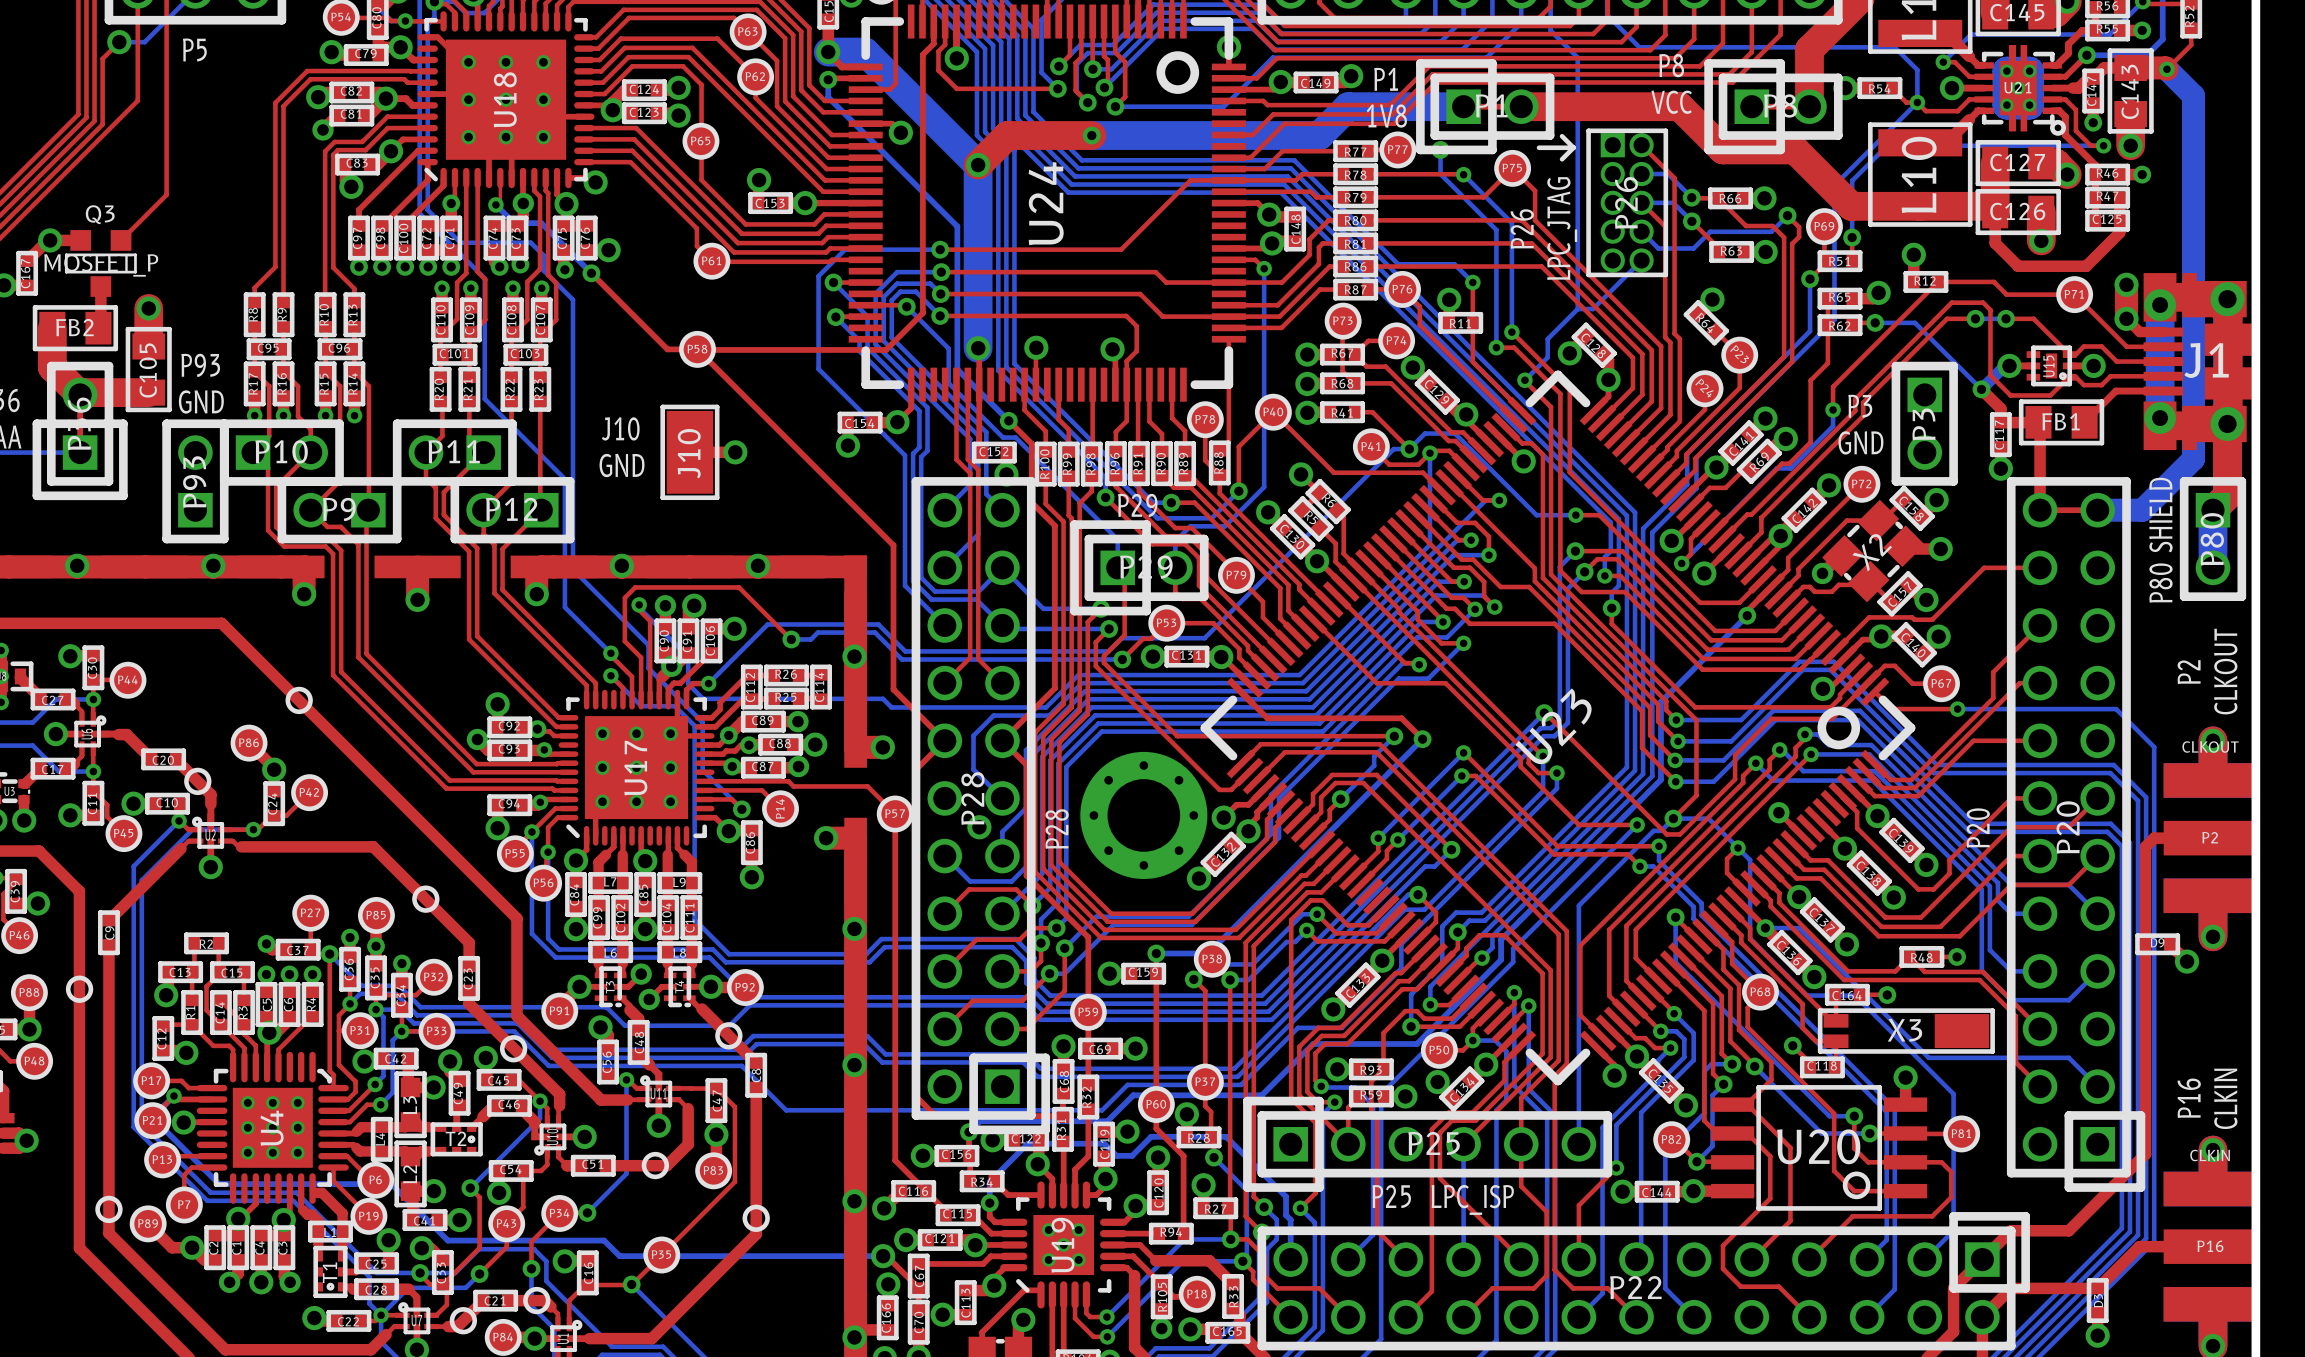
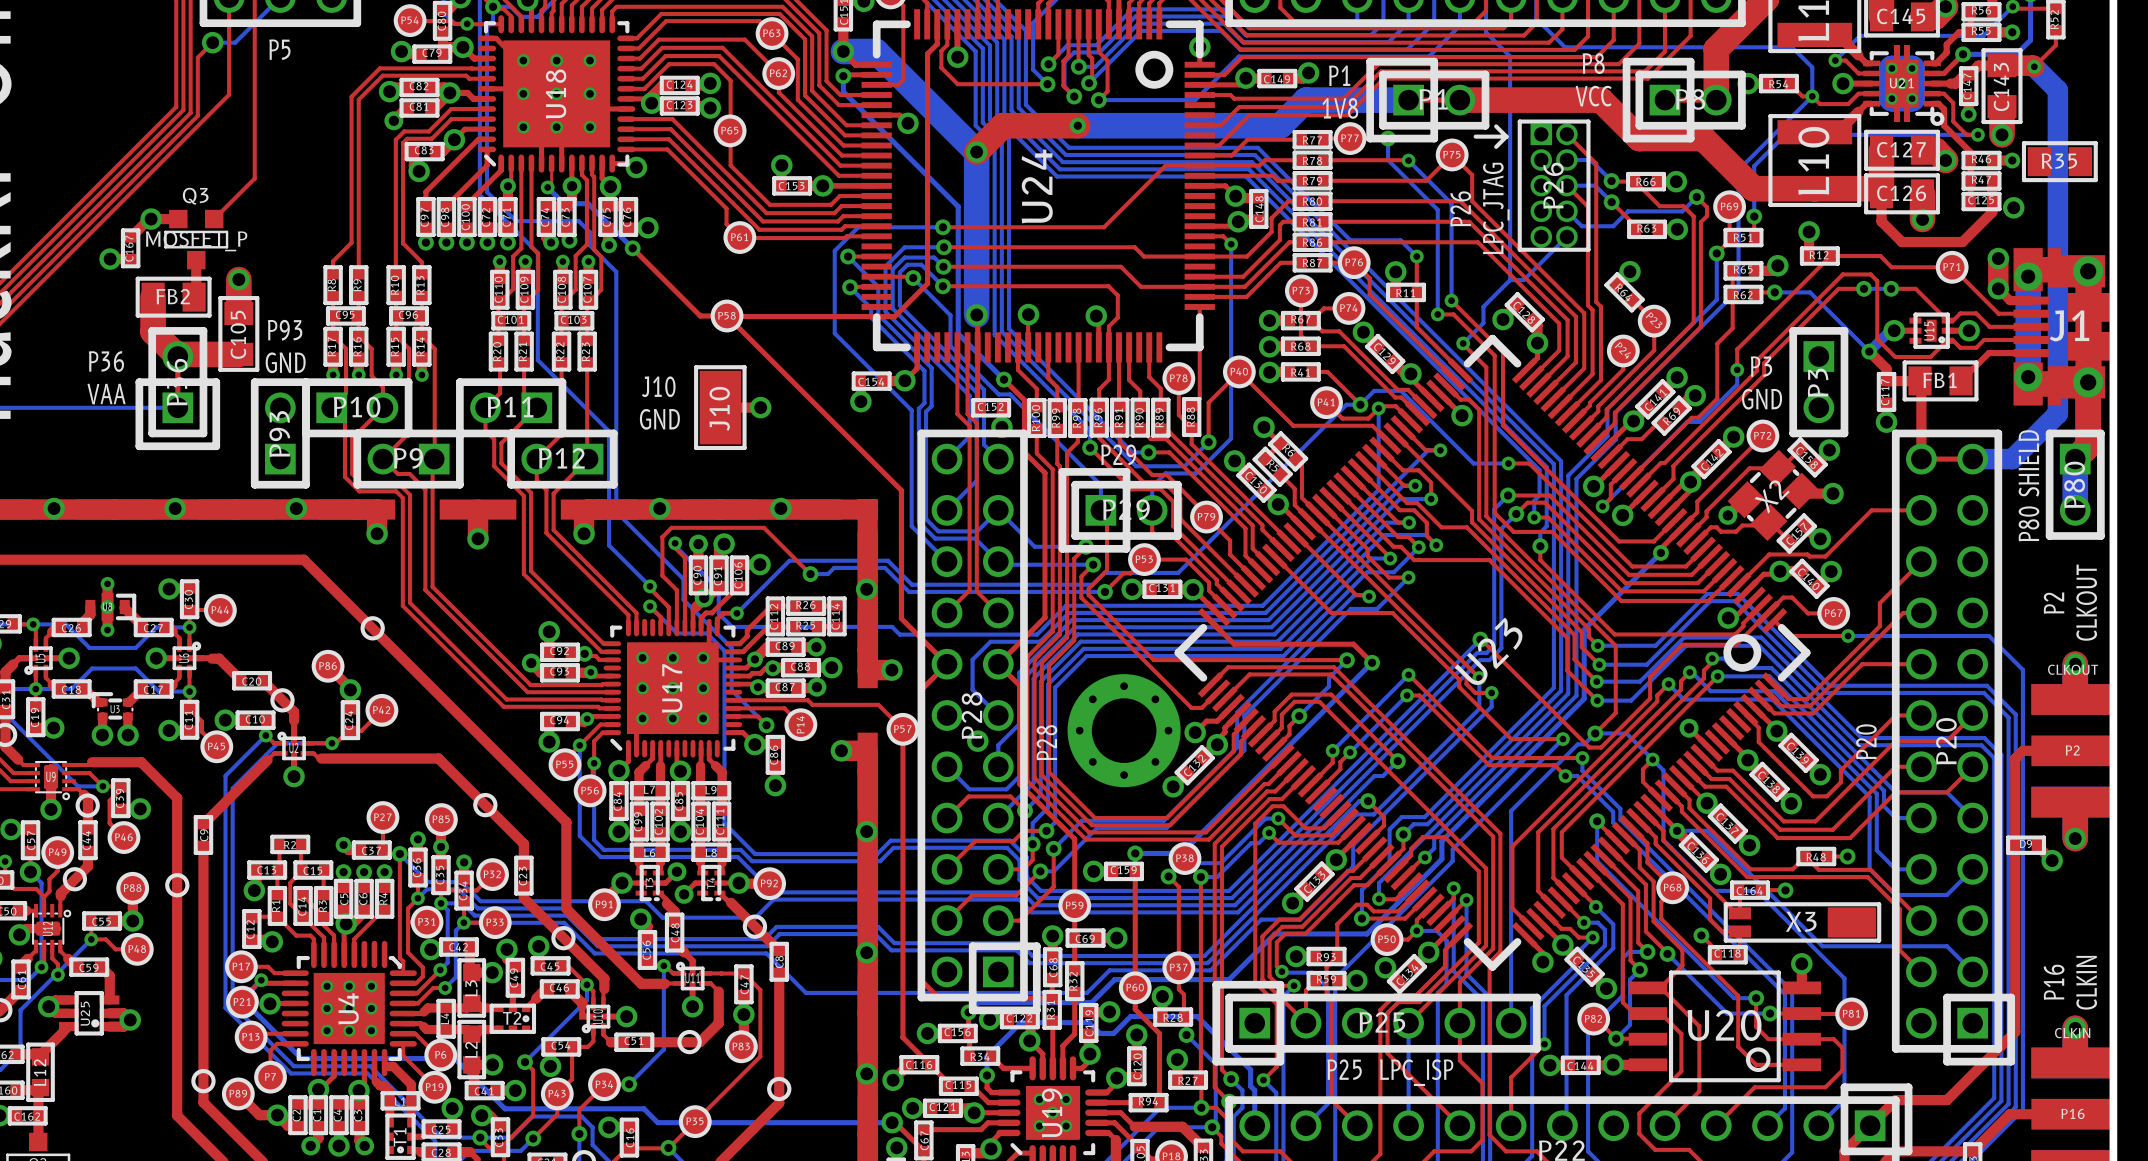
R35: none -> (2059, 161)
via: none -> (2013, 207)

